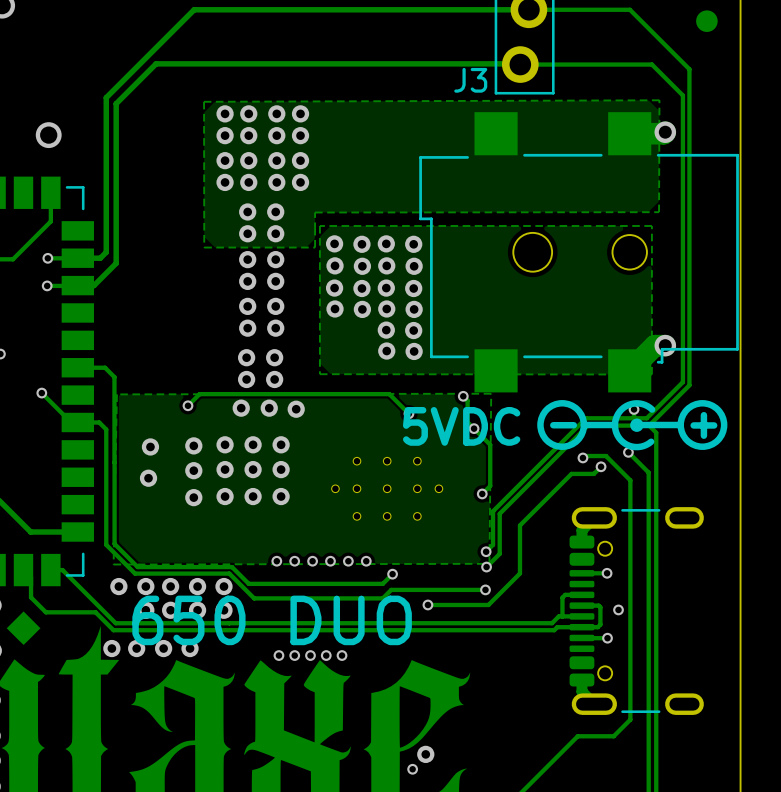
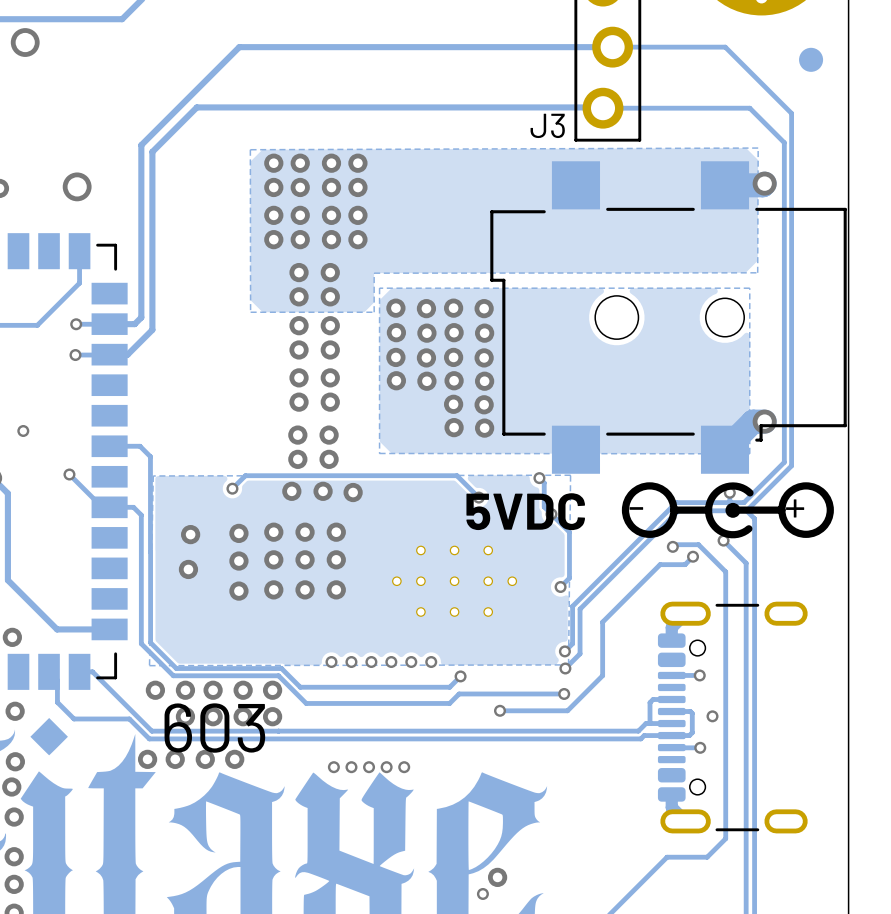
text: 650 DUO (272, 620) -> 603 (214, 728)

